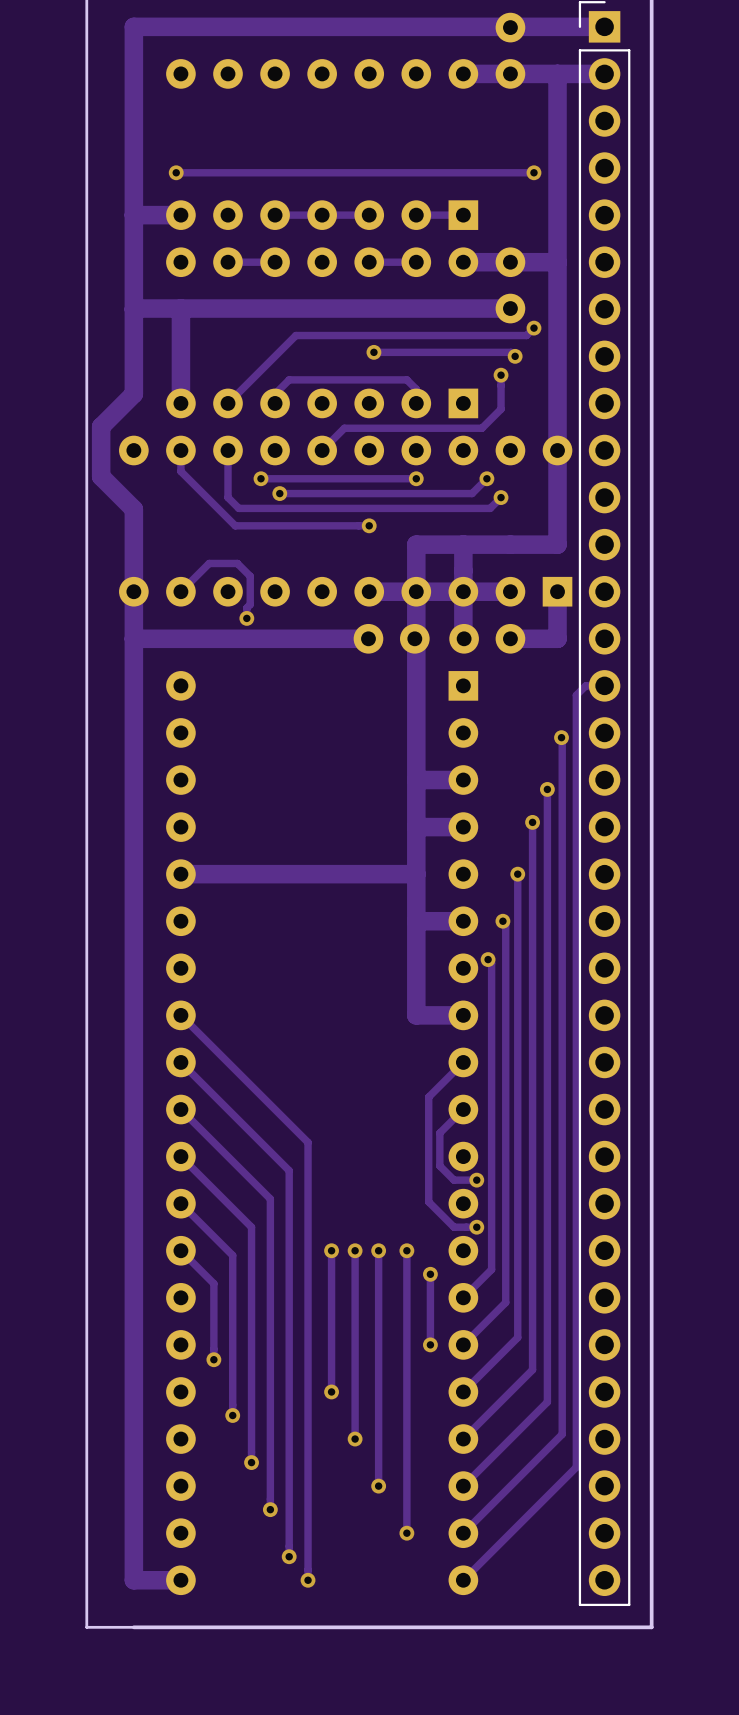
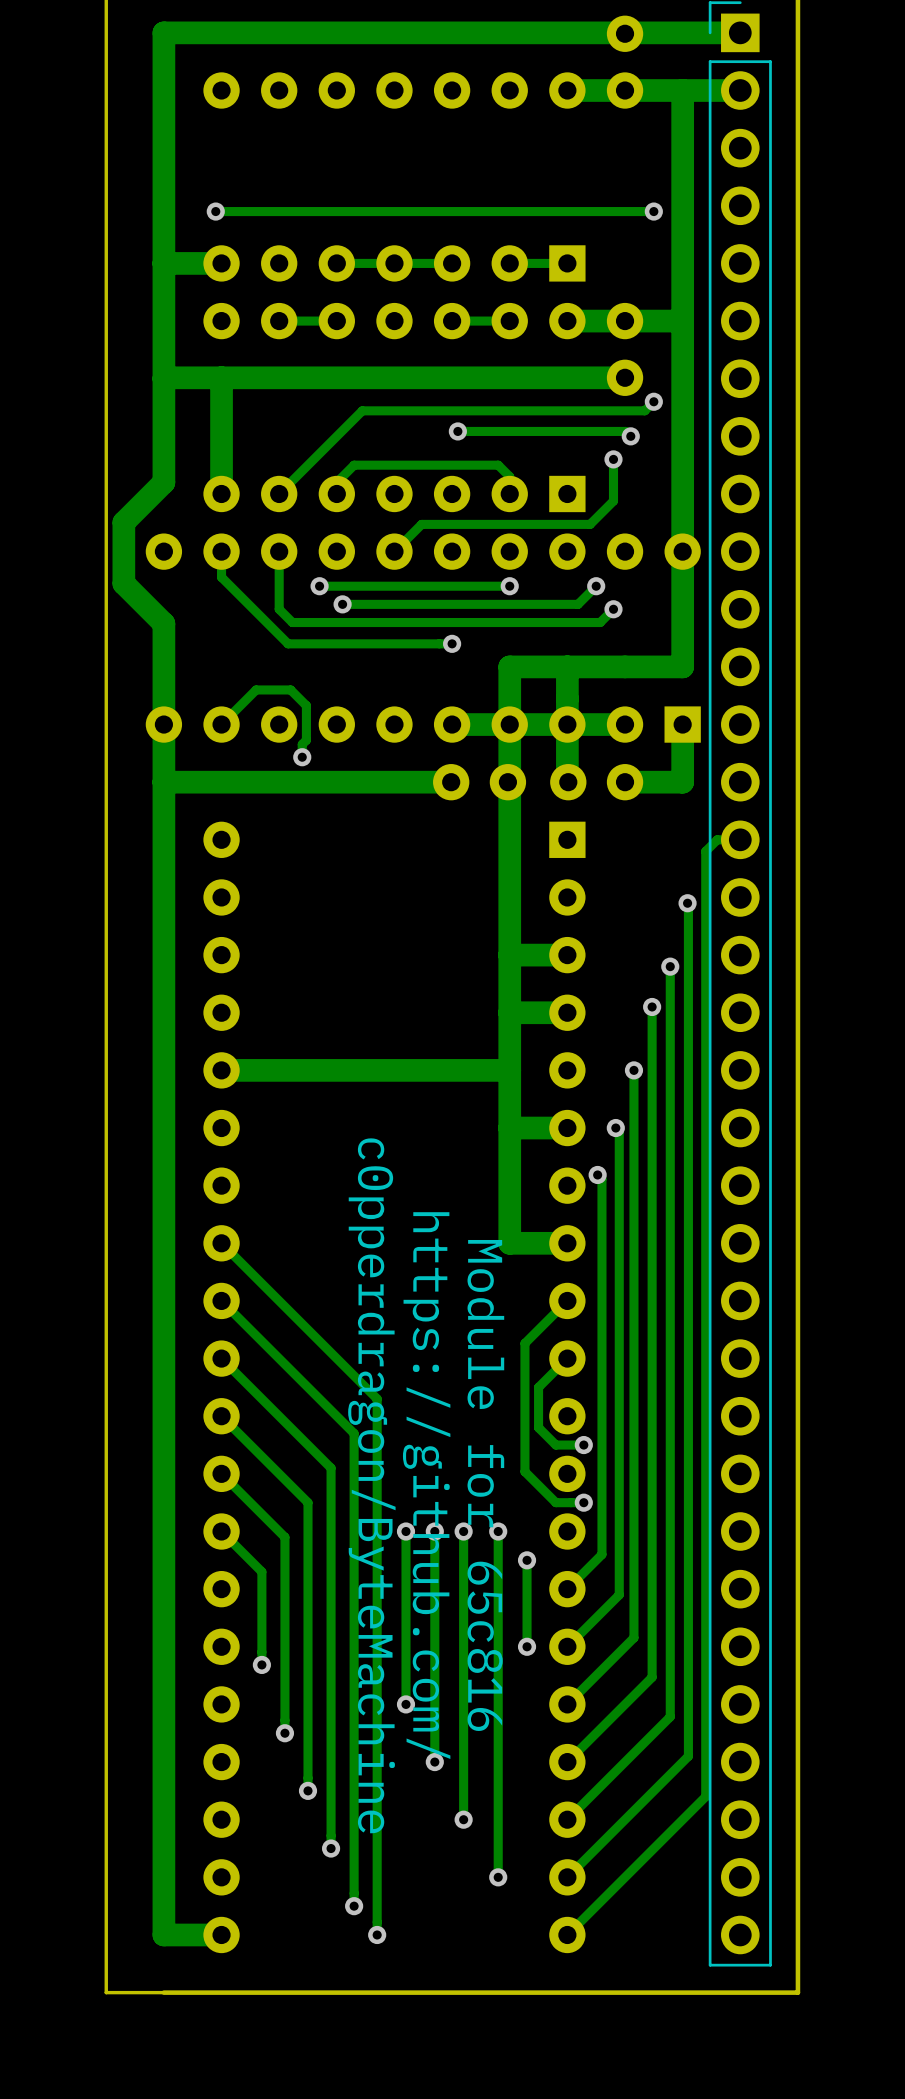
text: none -> c0pperdragon/ByteMachine (371, 1485)
text: none -> Module for 65c816 (485, 1485)
text: none -> https://github.com/ (426, 1485)

